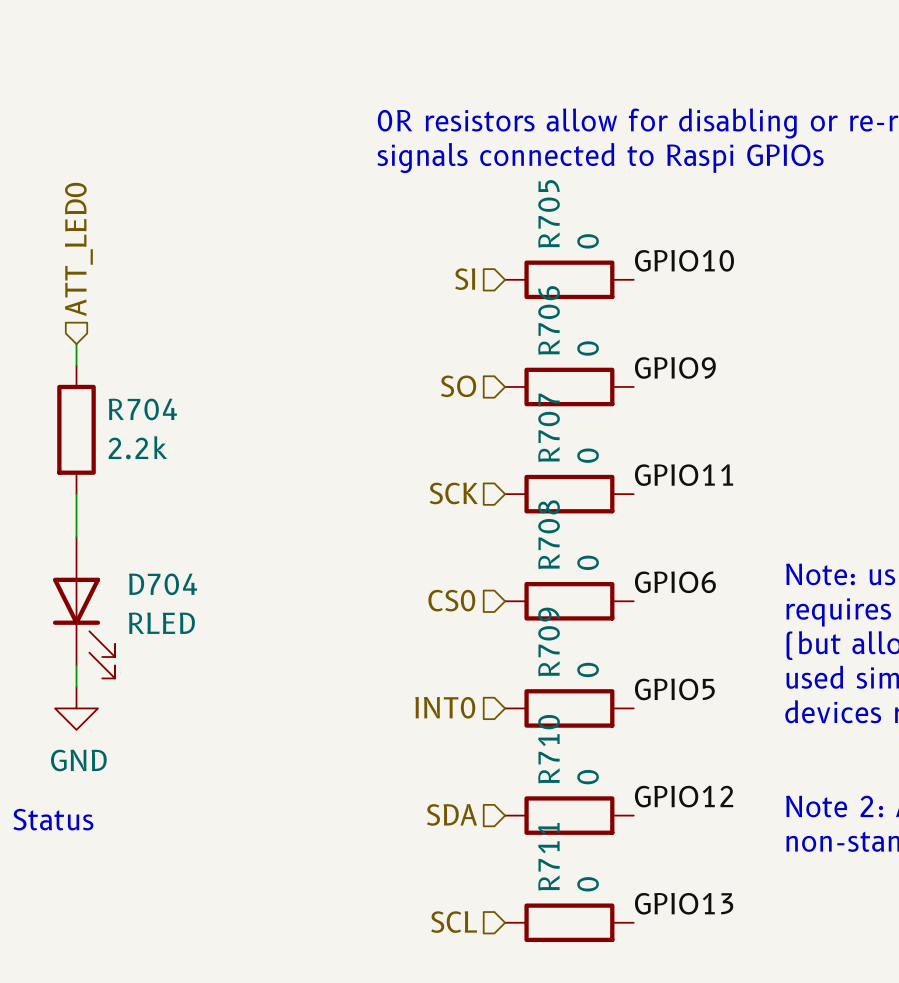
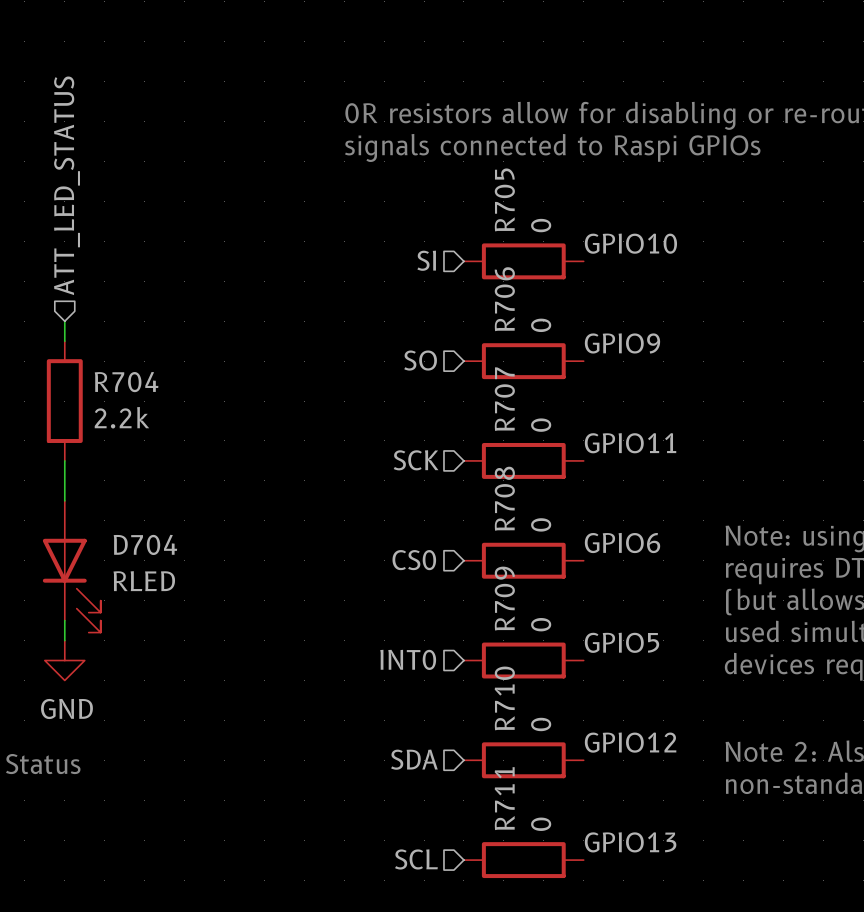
hierarchical label: ATT_LED0 (78, 249) -> ATT_LED_STATUS (67, 185)

